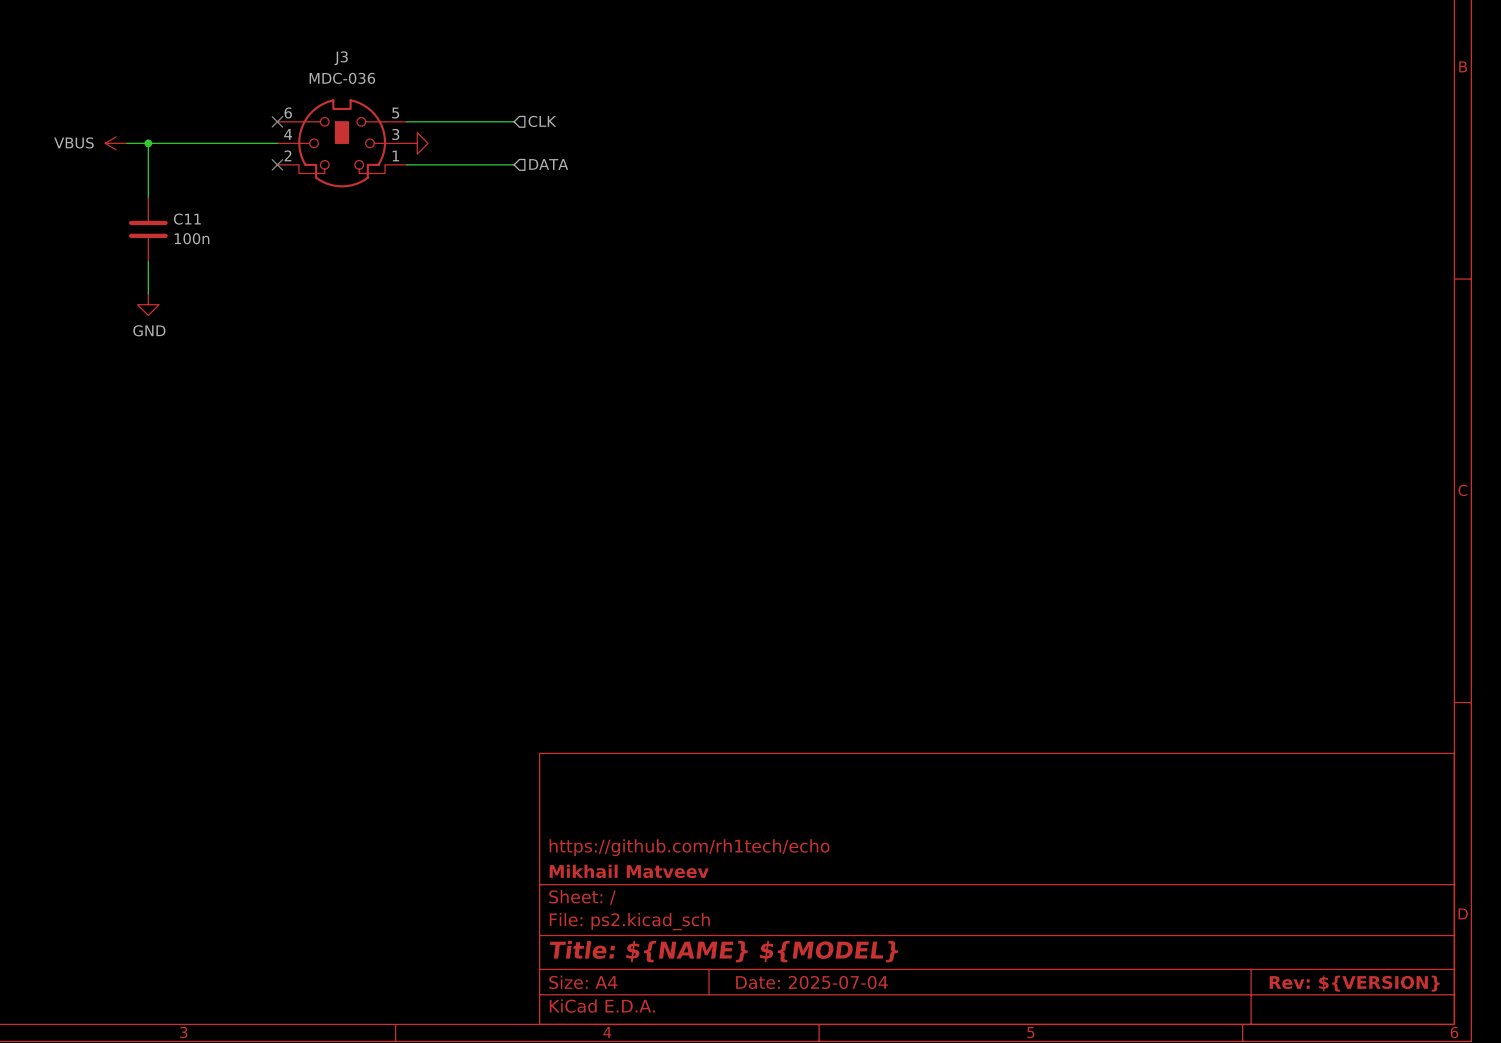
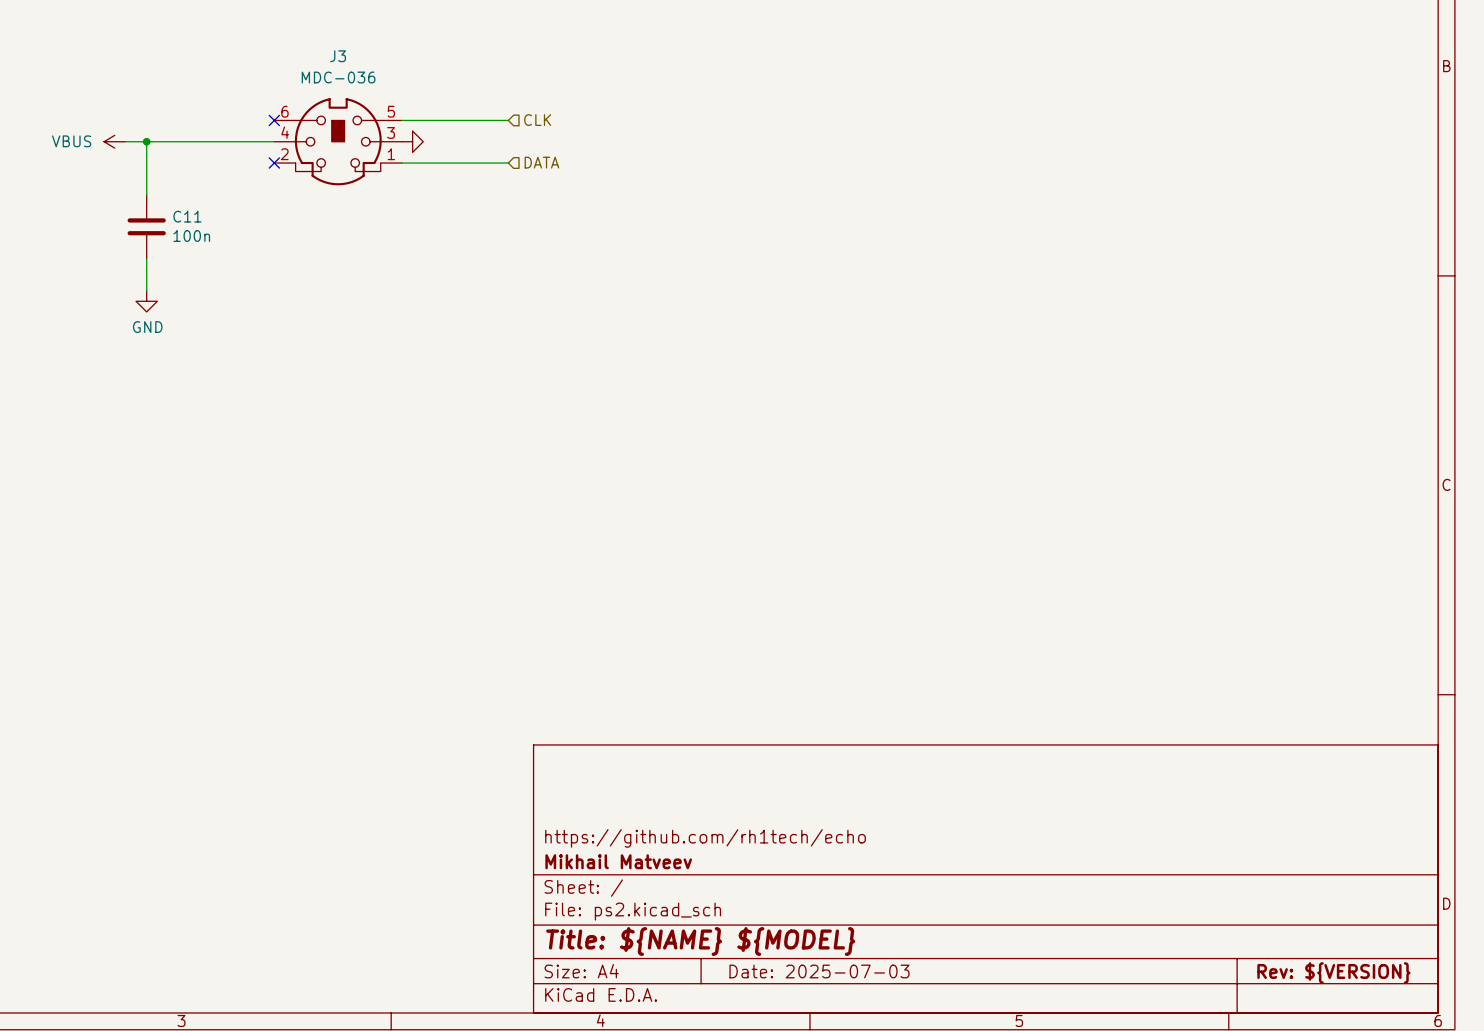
title block: Date: 2025-07-04 (811, 982) -> Date: 2025-07-03 (819, 971)

